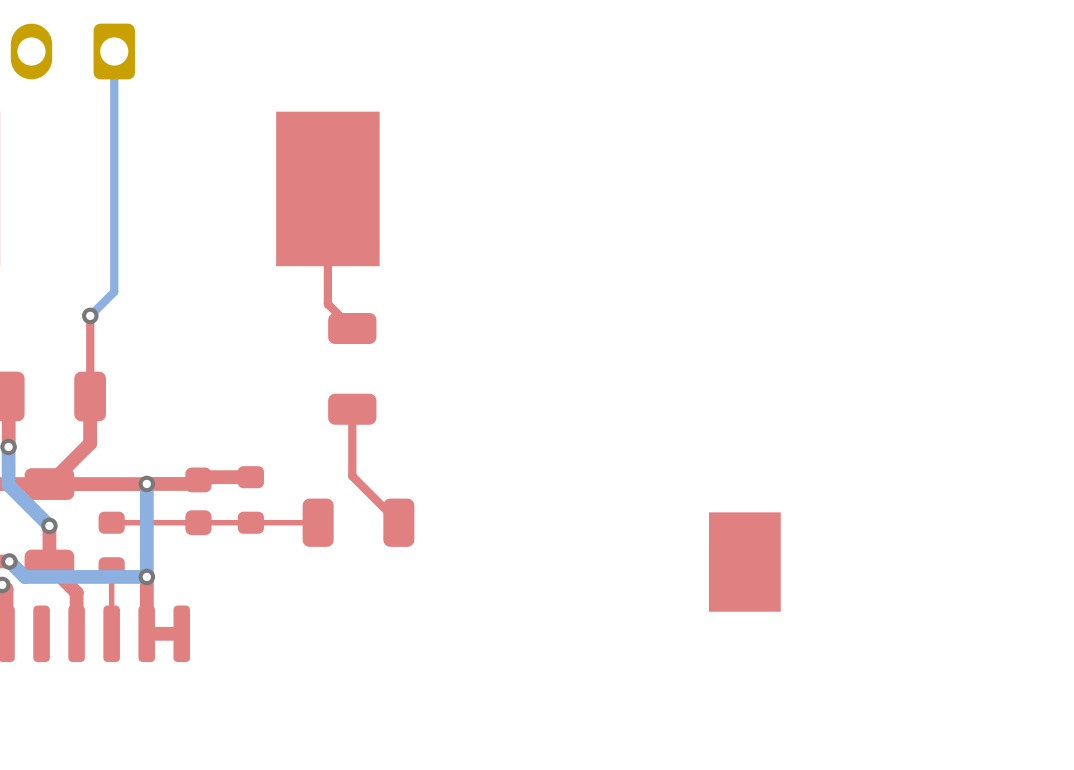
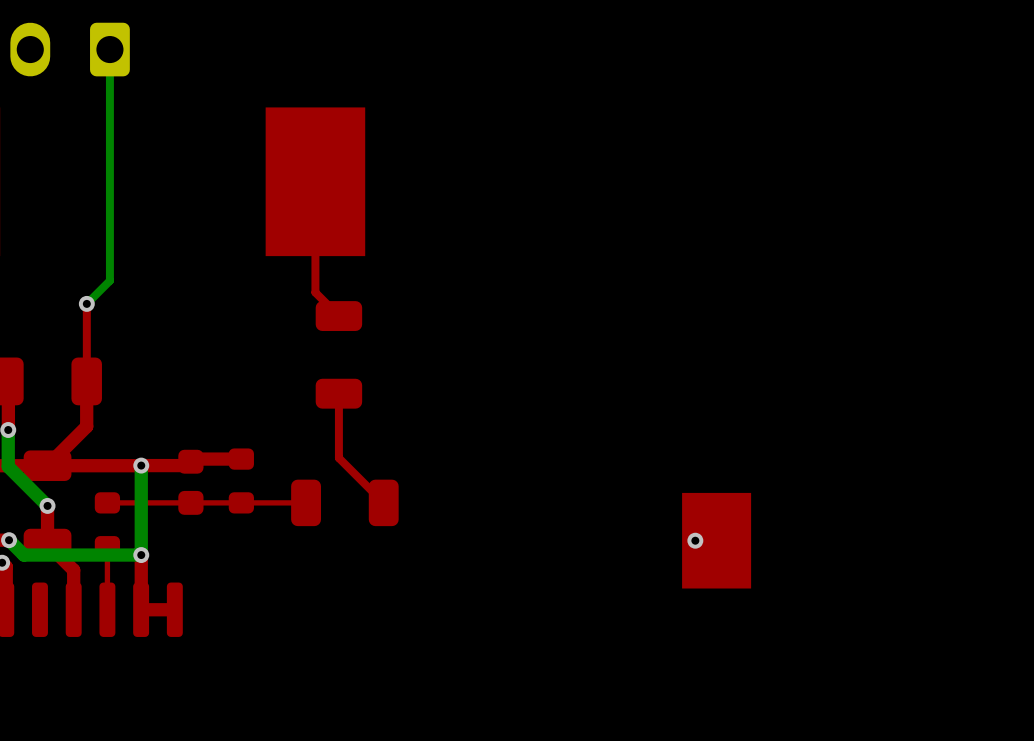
via: none -> (695, 540)

